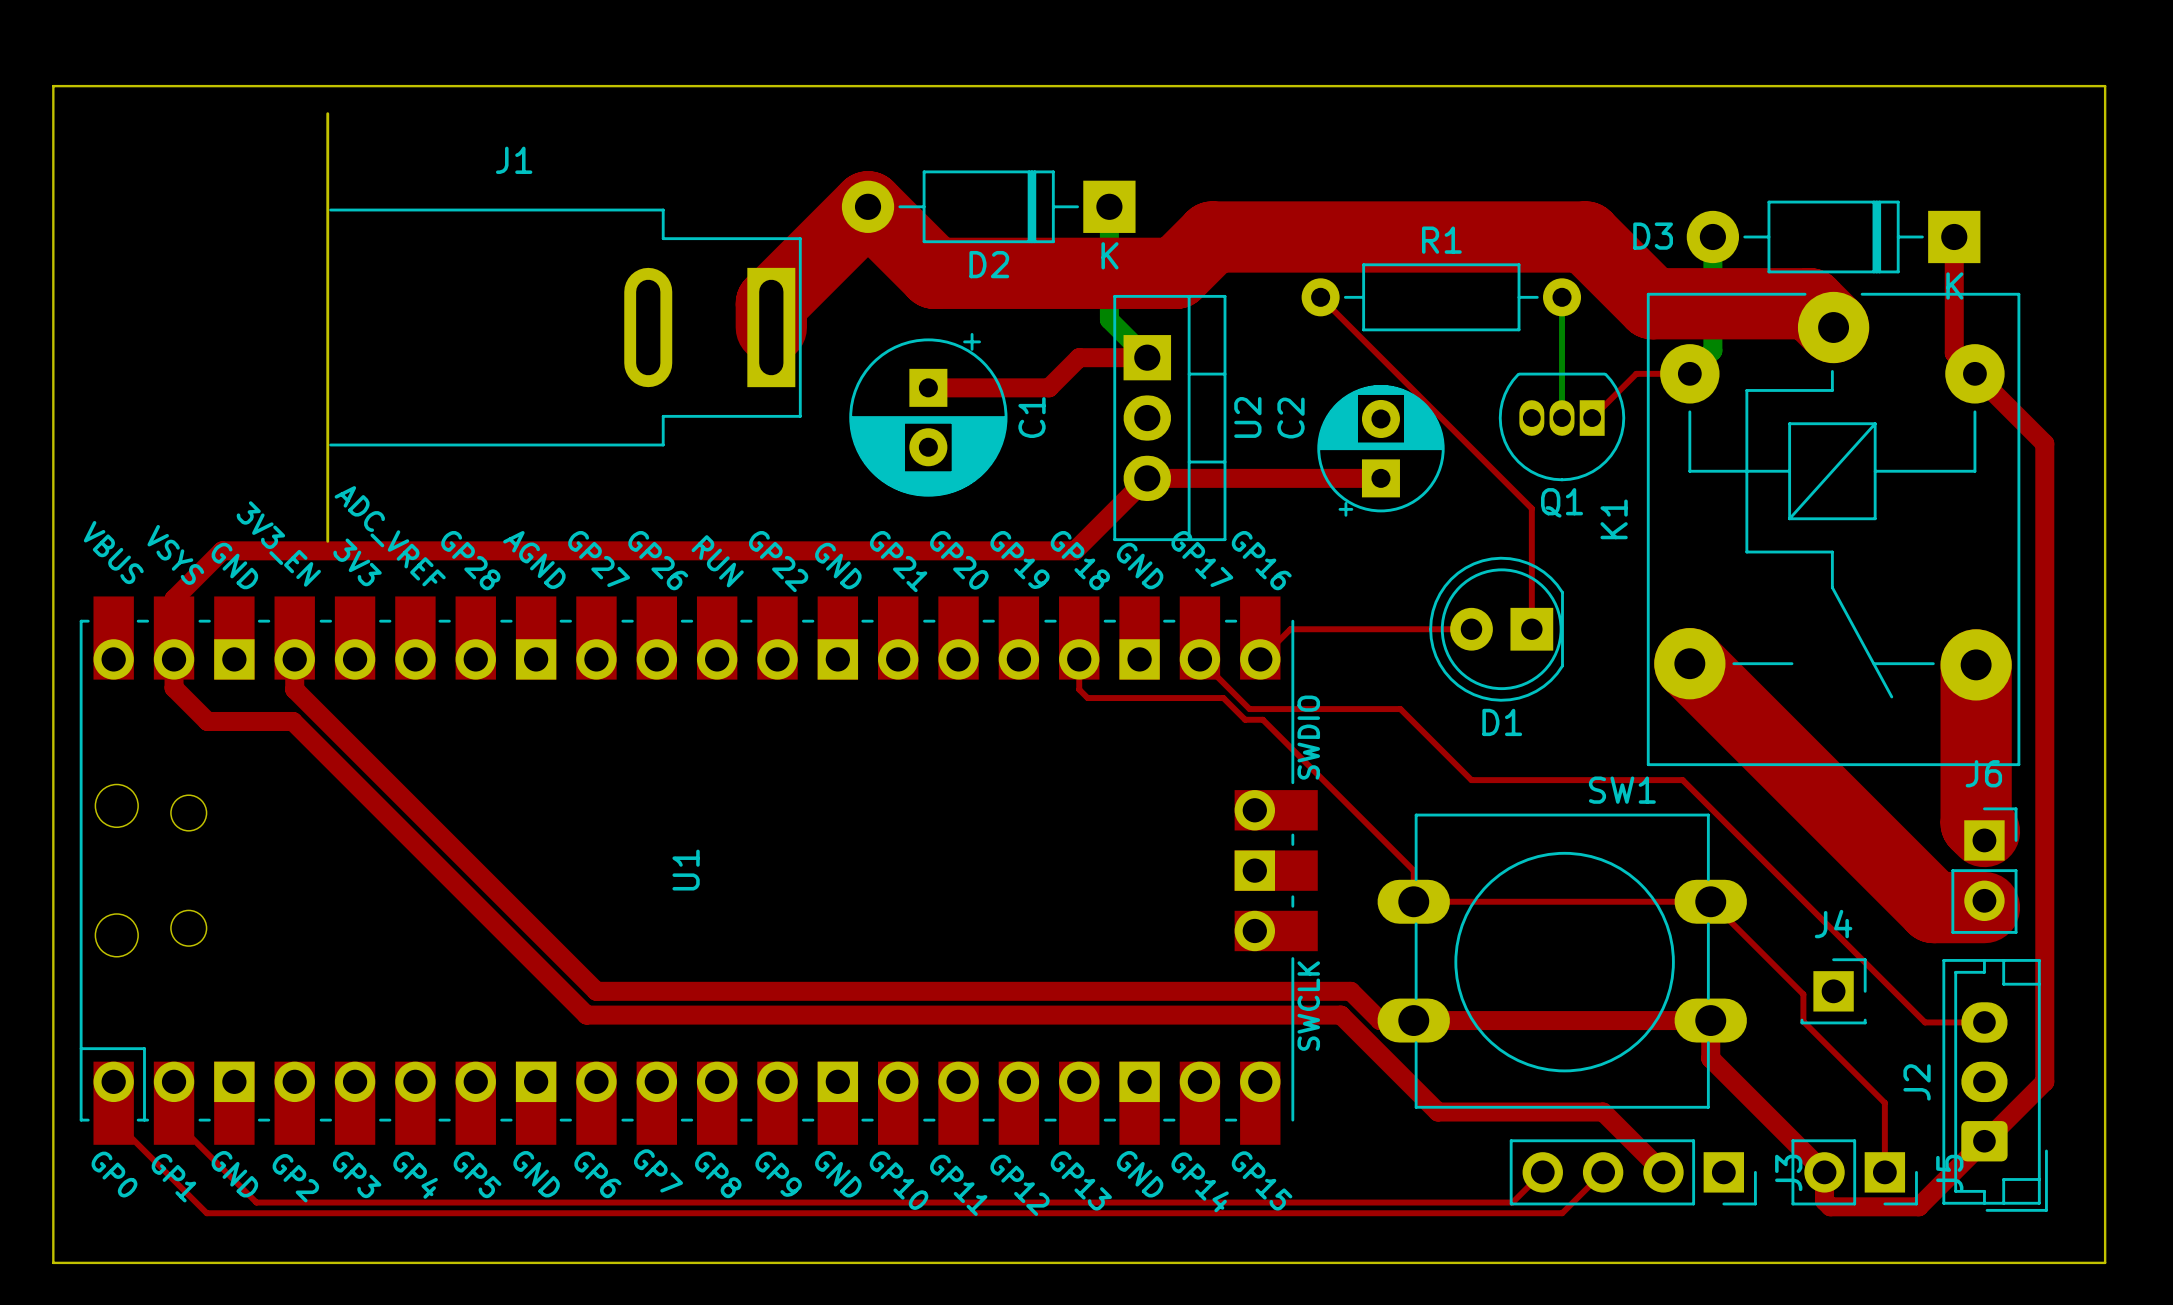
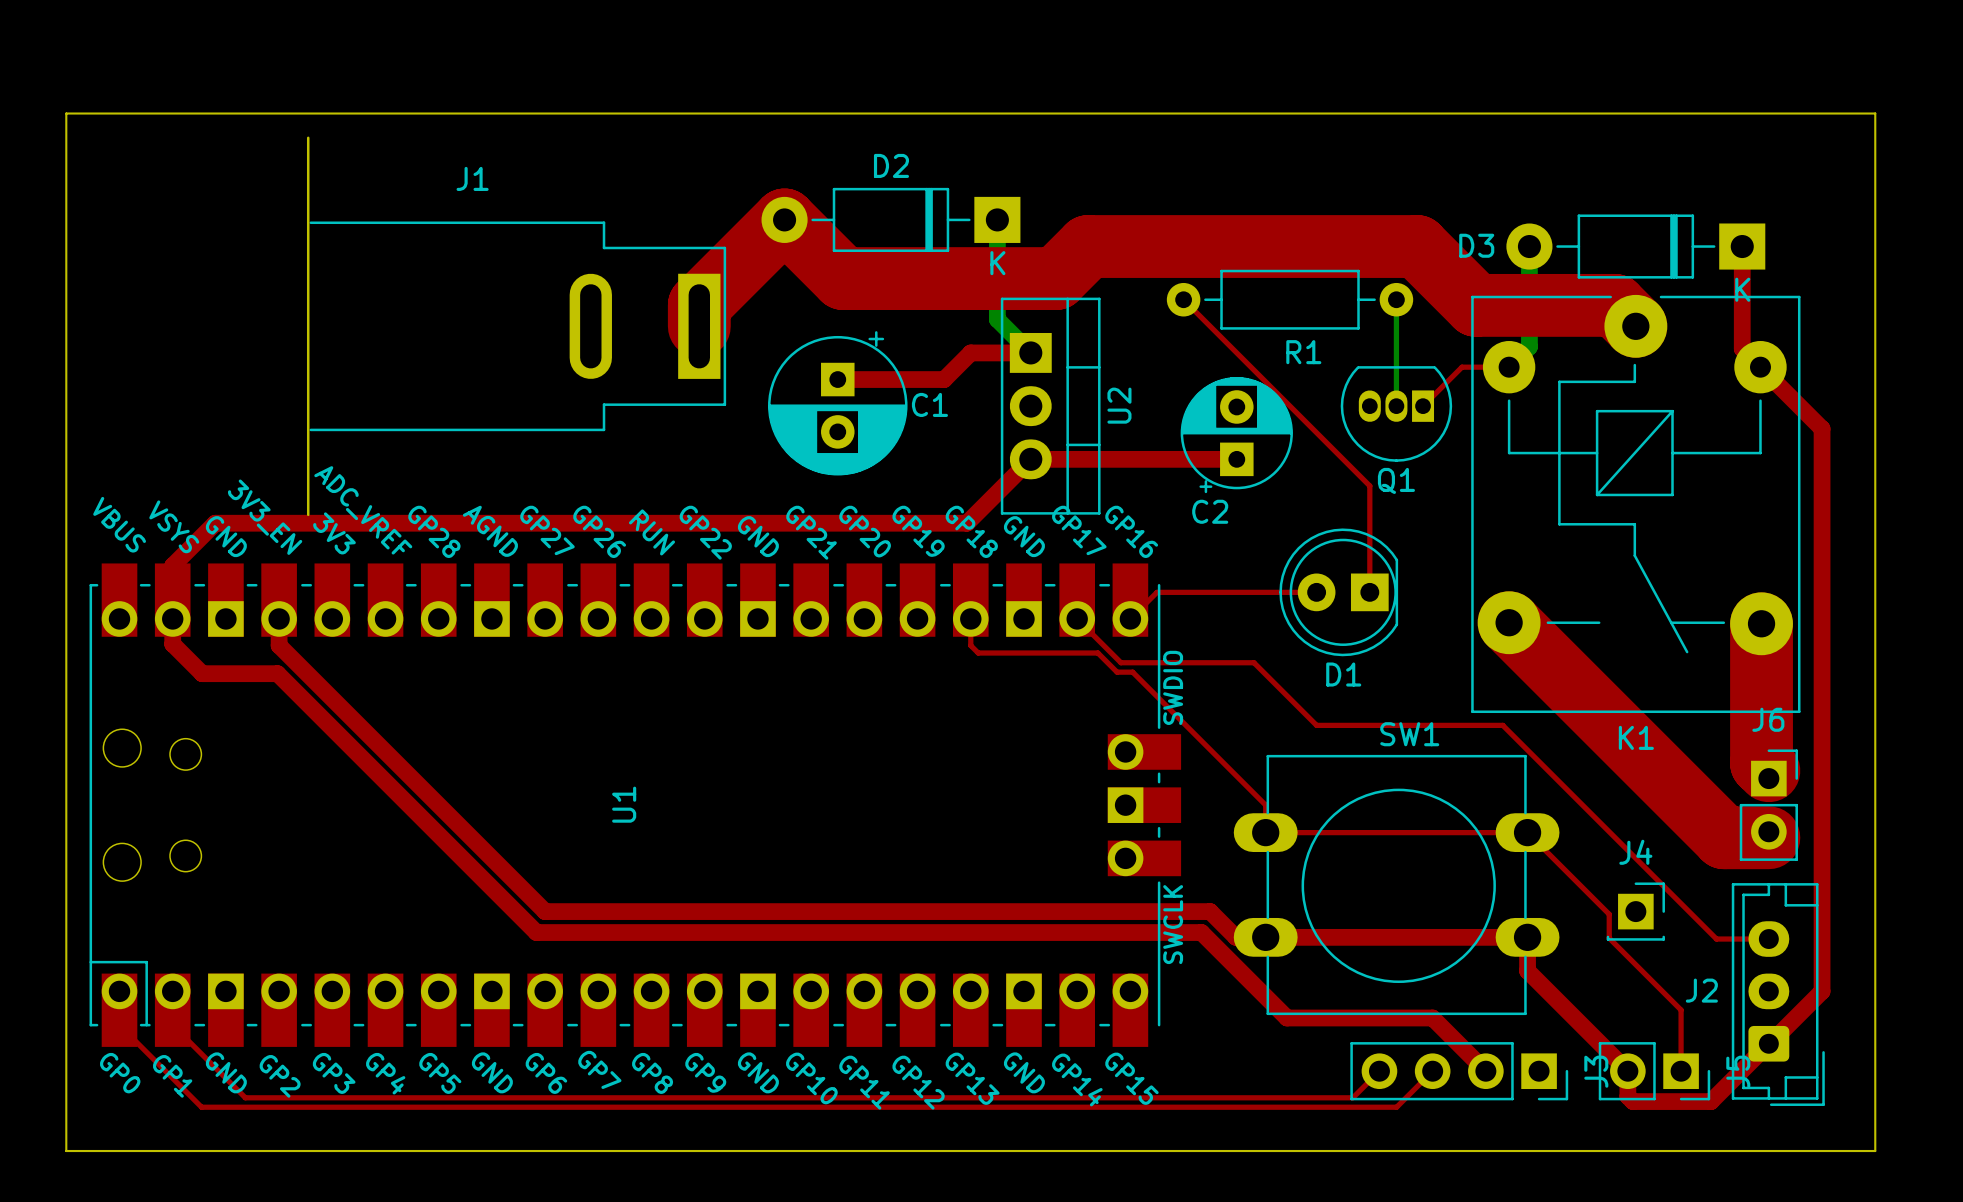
R1 name position: R1 (1441, 240) -> R1 (1303, 352)
D2 name position: D2 (989, 264) -> D2 (891, 165)
C1 name rotation: 0° (1032, 417) -> 90° clockwise (929, 404)
C2 name rotation: 0° (1290, 418) -> 90° clockwise (1210, 511)
C2 name position: C2 (1290, 418) -> C2 (1210, 511)
K1 name rotation: 0° (1614, 519) -> 90° clockwise (1636, 737)
K1 name position: K1 (1614, 519) -> K1 (1636, 737)
SW1 name position: SW1 (1622, 790) -> SW1 (1409, 734)
J2 name rotation: 0° (1917, 1082) -> 90° clockwise (1701, 990)

